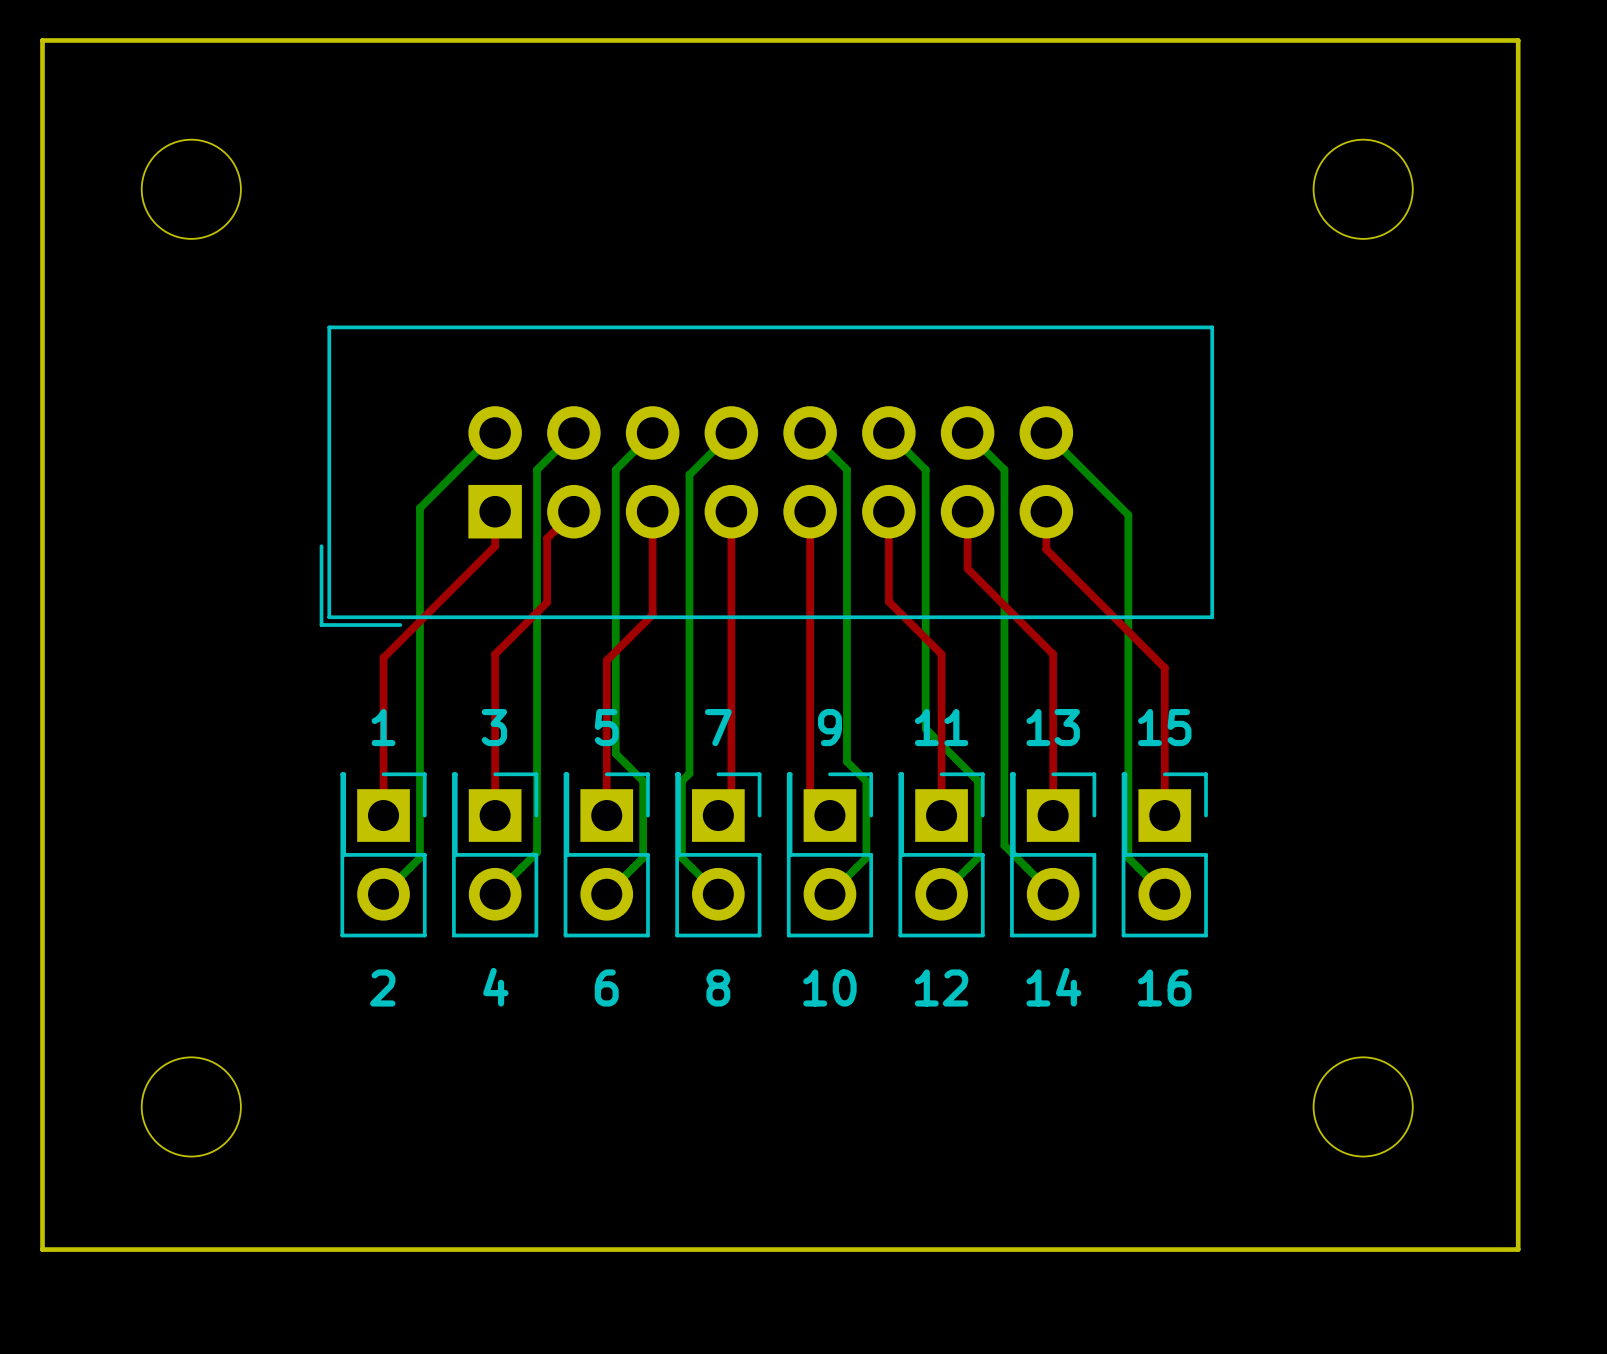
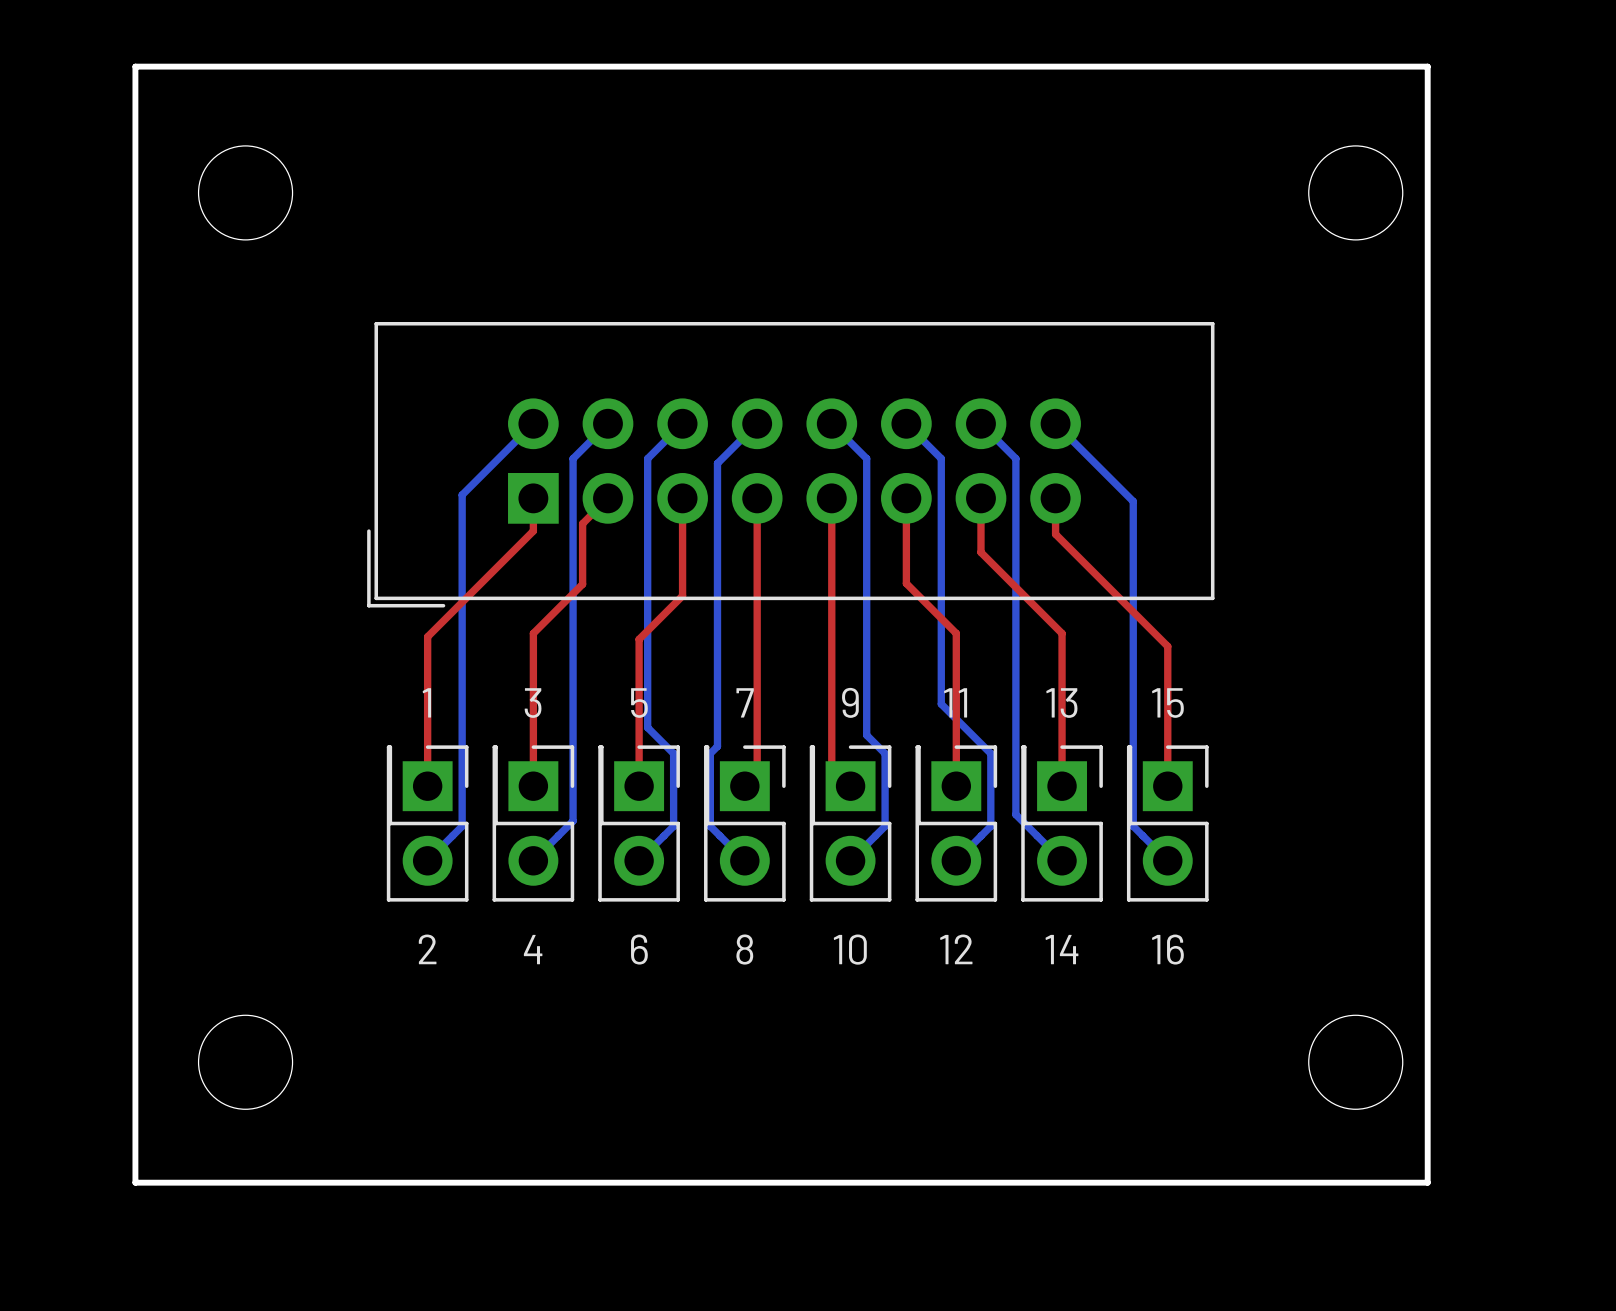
board edge: (42, 40) (42, 1249) (1518, 1249) (1518, 40) (42, 40) -> (135, 66) (135, 1182) (1427, 1182) (1427, 66) (135, 66)

